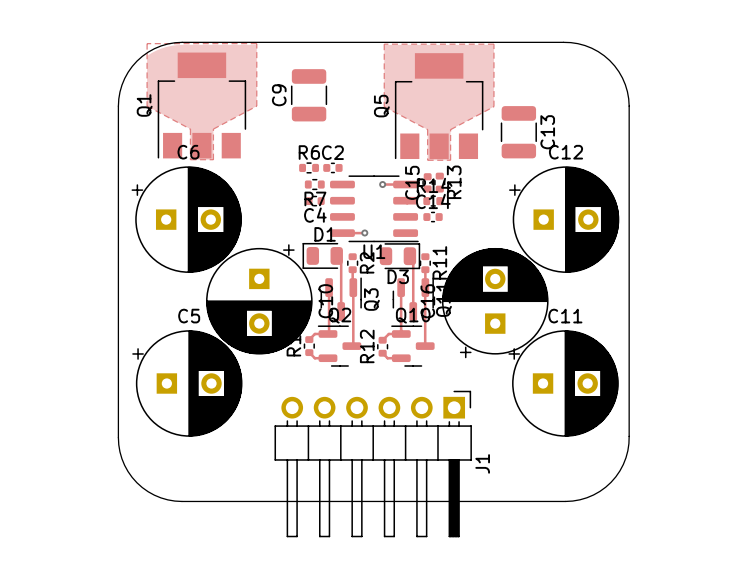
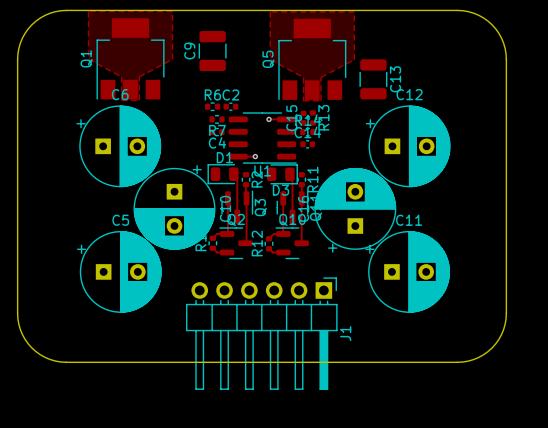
board edge: (182, 42) (167, 43) (154, 48) (137, 61) (128, 72) (121, 85) (118, 106) (118, 444) (124, 465) (136, 482) (154, 495) (167, 499) (181, 501) -> (115, 10) (61, 10) (45, 15) (36, 21) (25, 33) (18, 48) (17, 59) (17, 313) (20, 329) (31, 348) (50, 359) (66, 362) (115, 362)
board edge: (563, 42) (584, 45) (598, 51) (609, 60) (622, 78) (627, 91) (629, 106) (627, 450) (619, 470) (605, 487) (586, 497) (565, 501) -> (407, 10) (462, 10) (478, 15) (487, 21) (498, 33) (503, 43) (506, 59) (506, 313) (503, 329) (492, 348) (473, 359) (457, 362) (409, 362)

